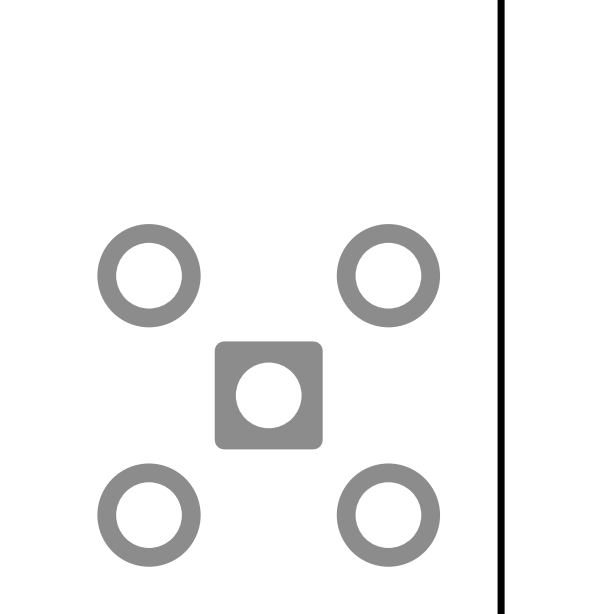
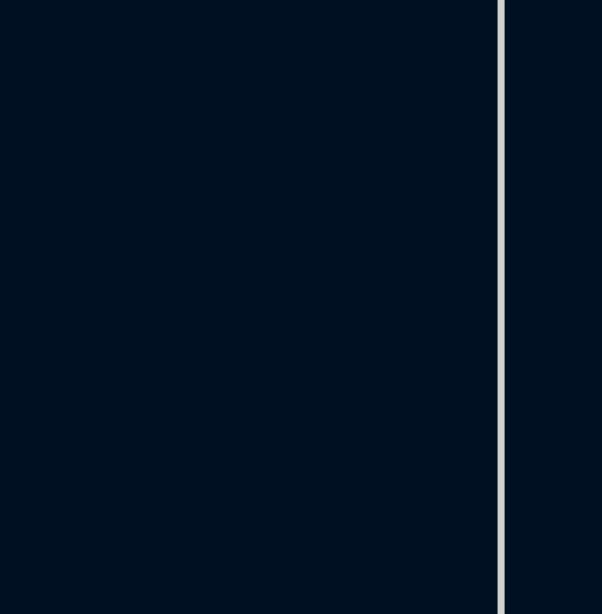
part: (268, 395) -> none

